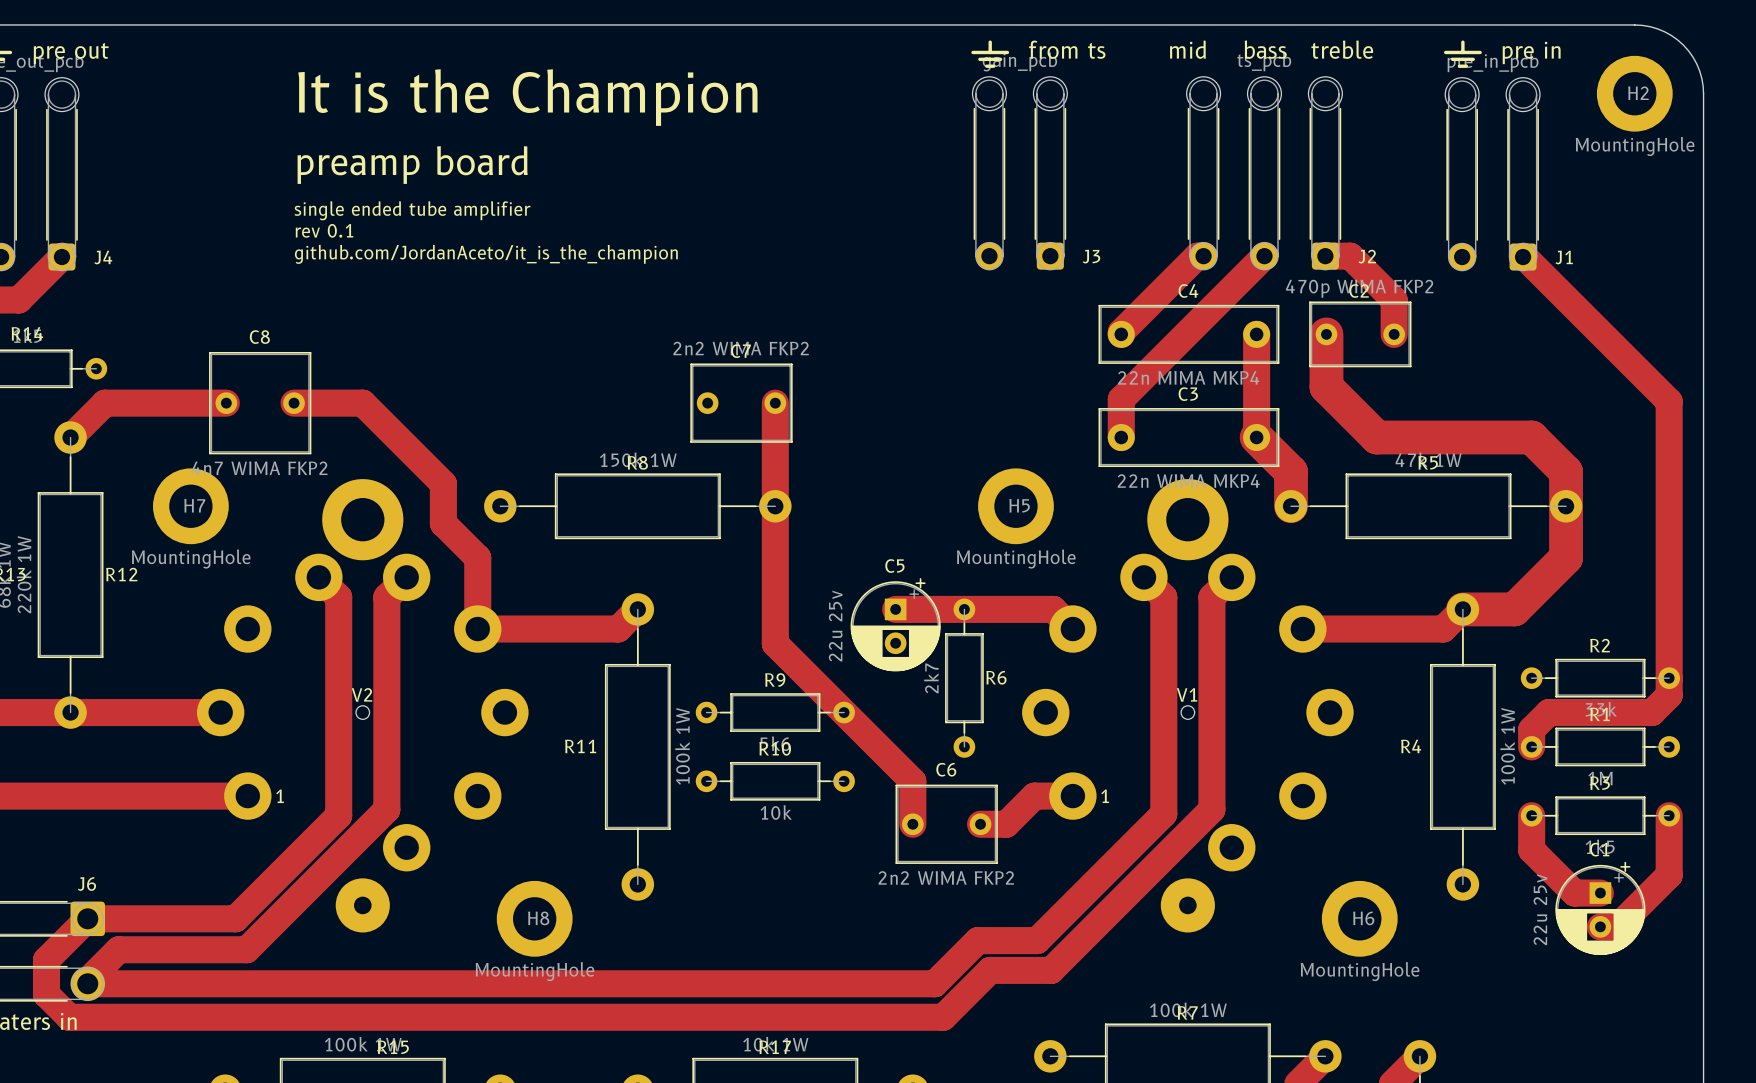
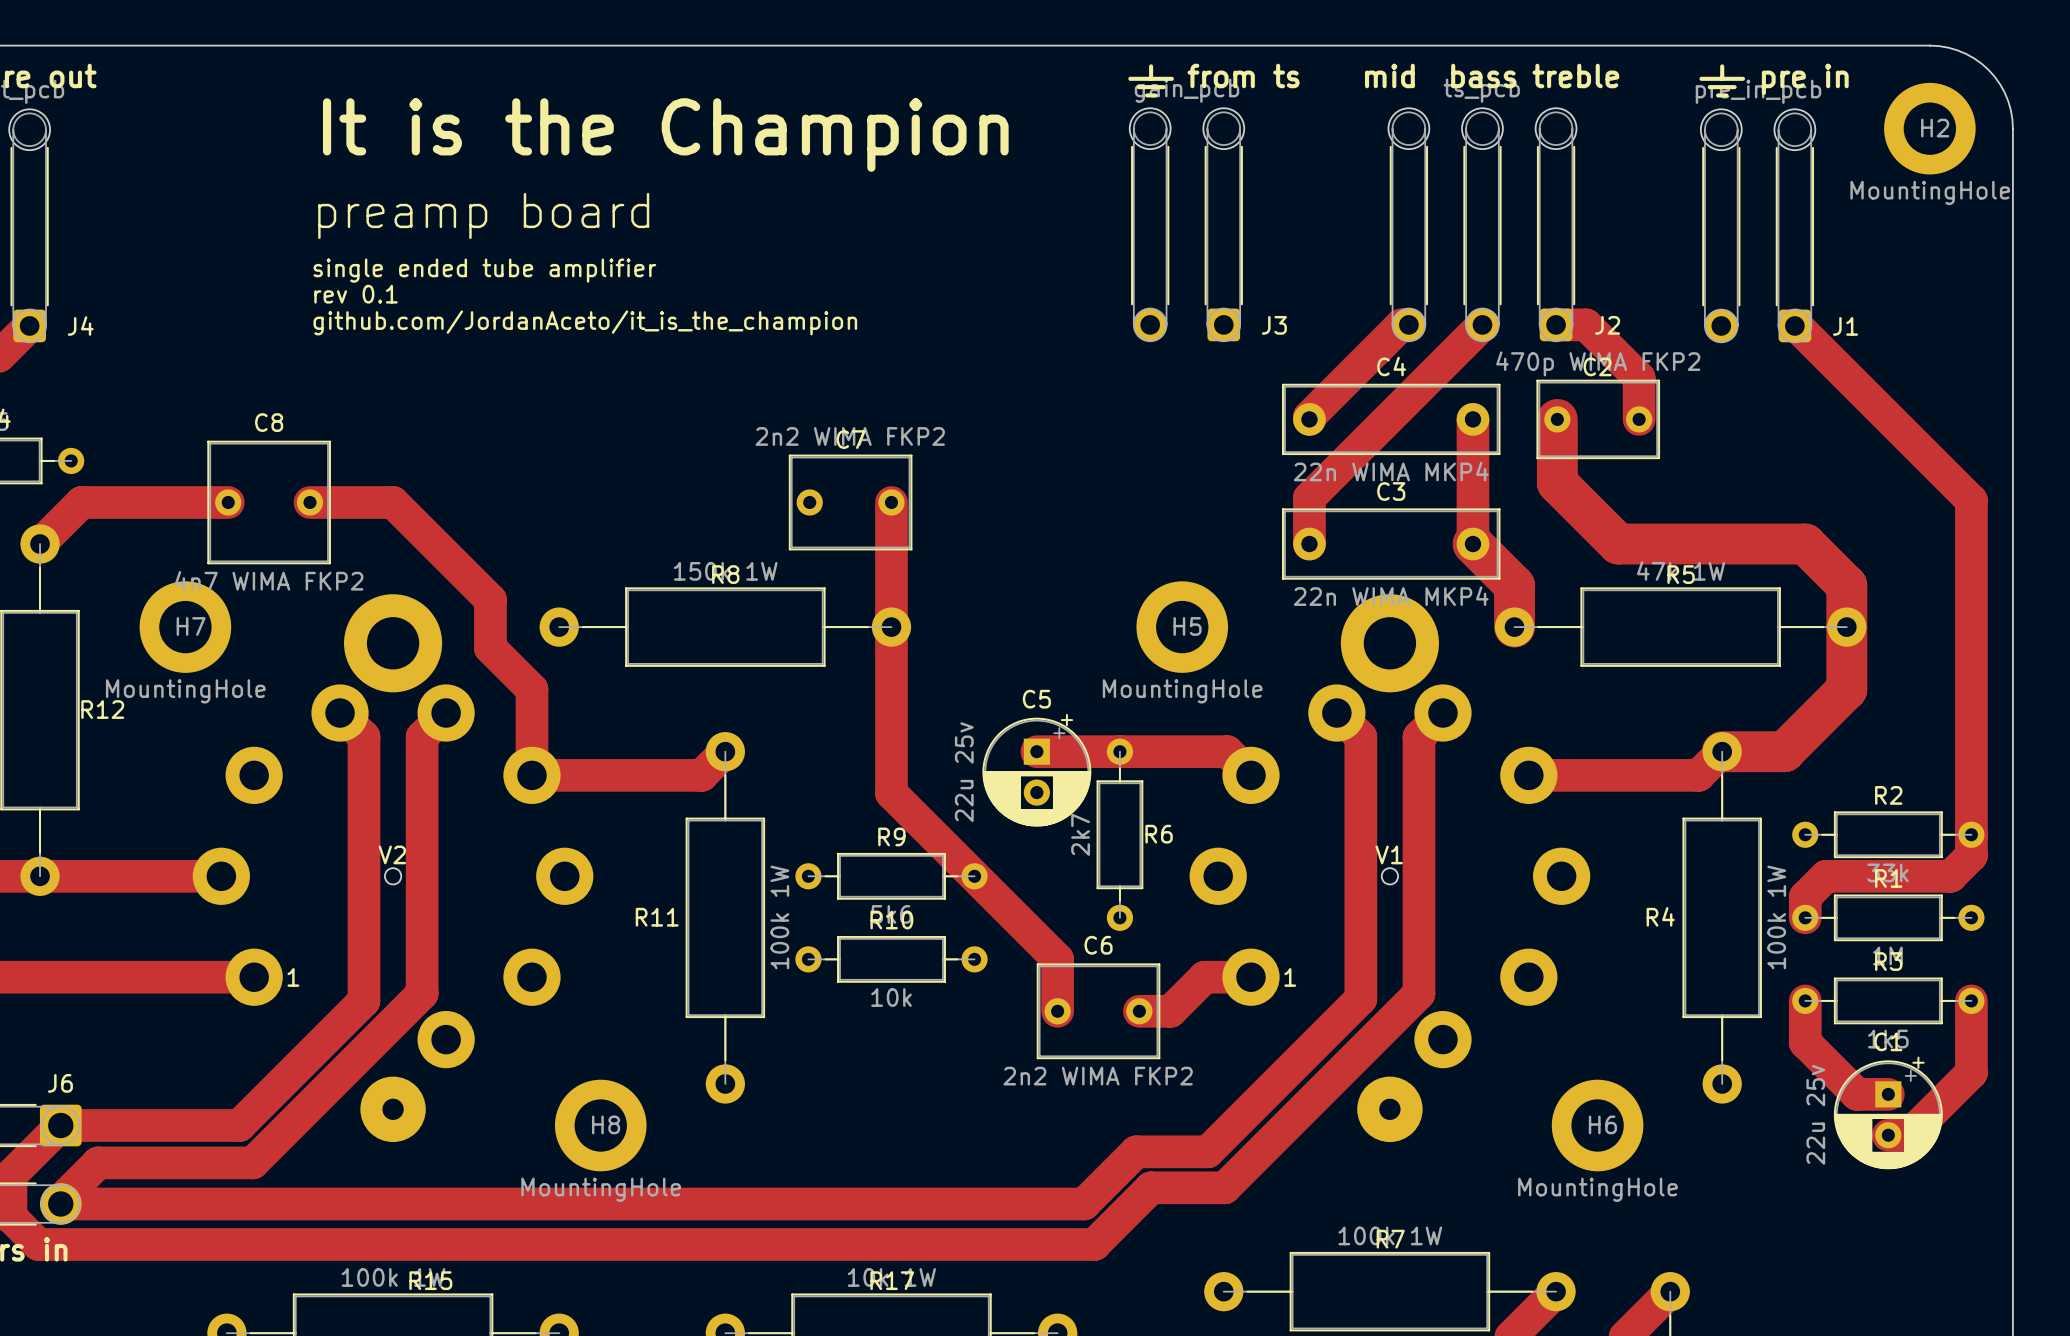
C4 value: 22n MIMA MKP4 (1188, 377) -> 22n WIMA MKP4 (1391, 471)

